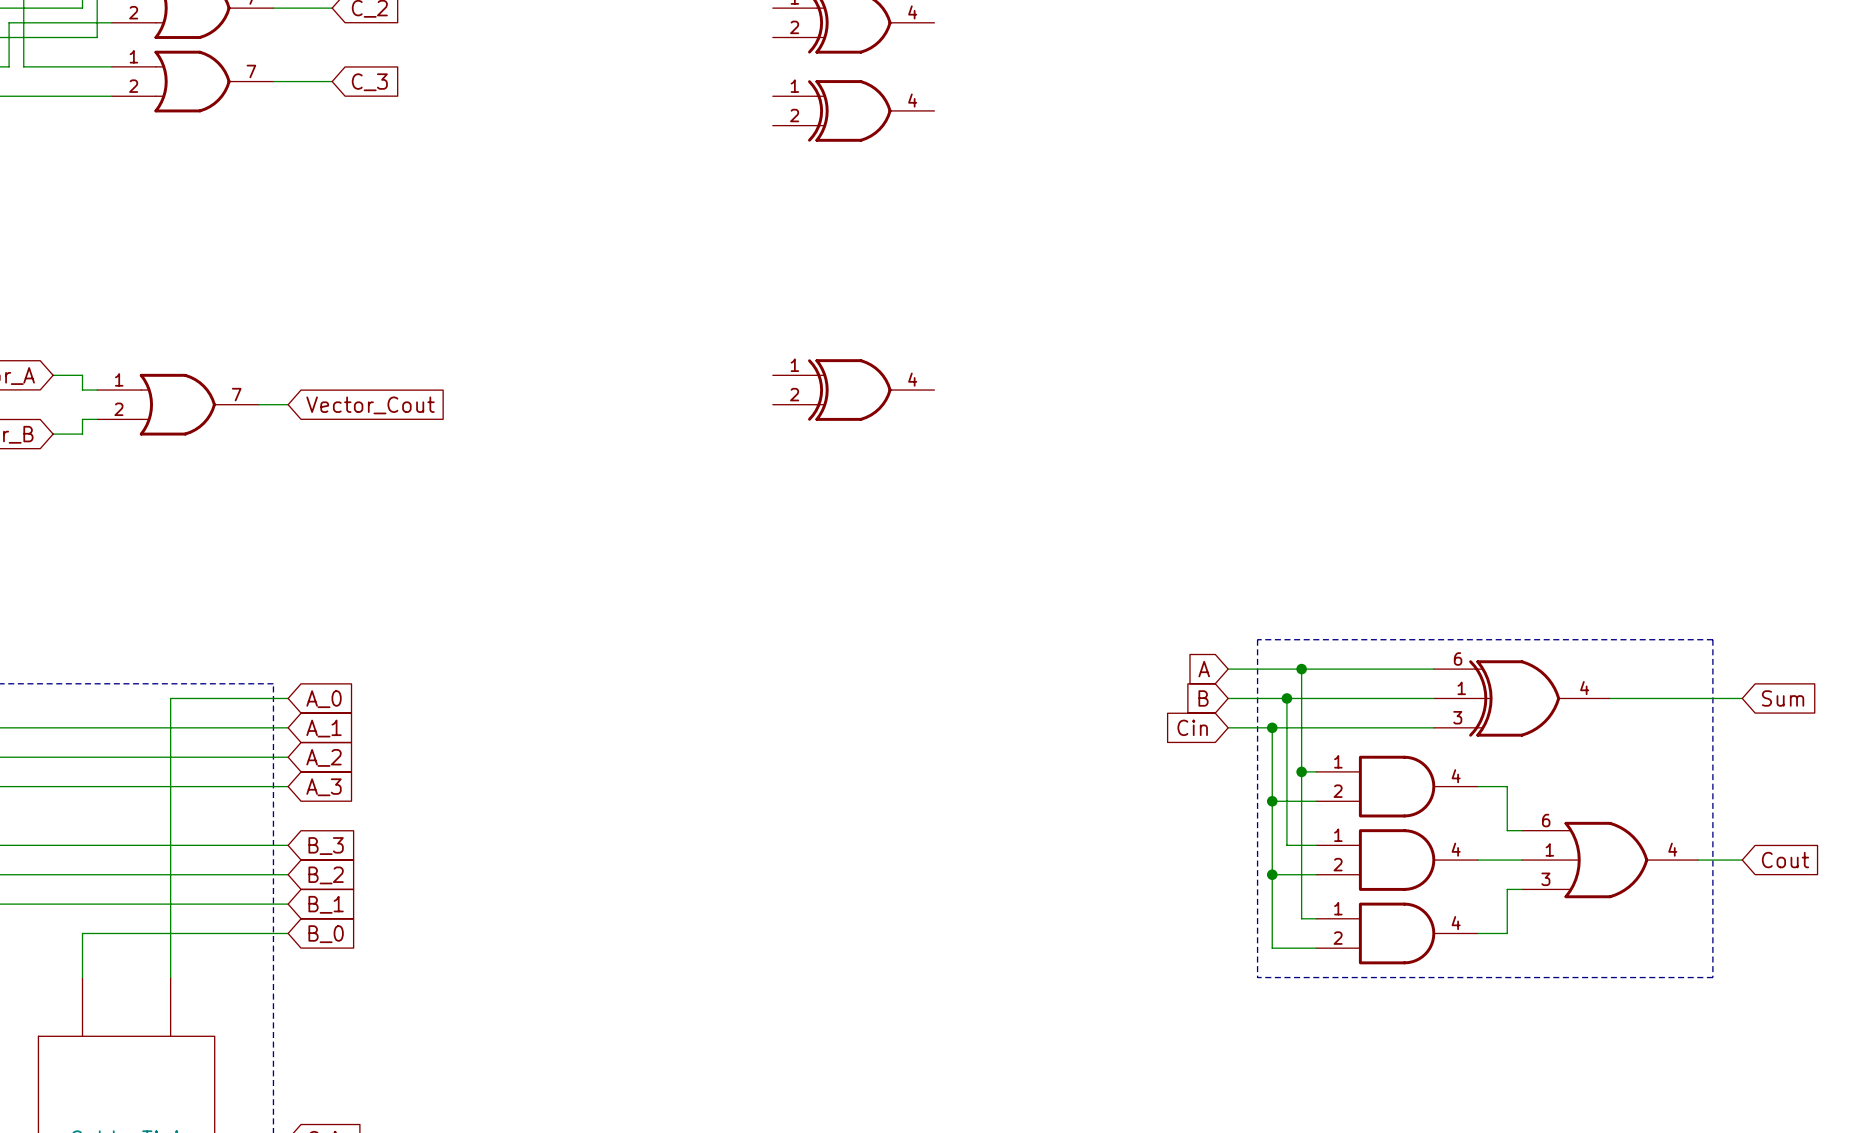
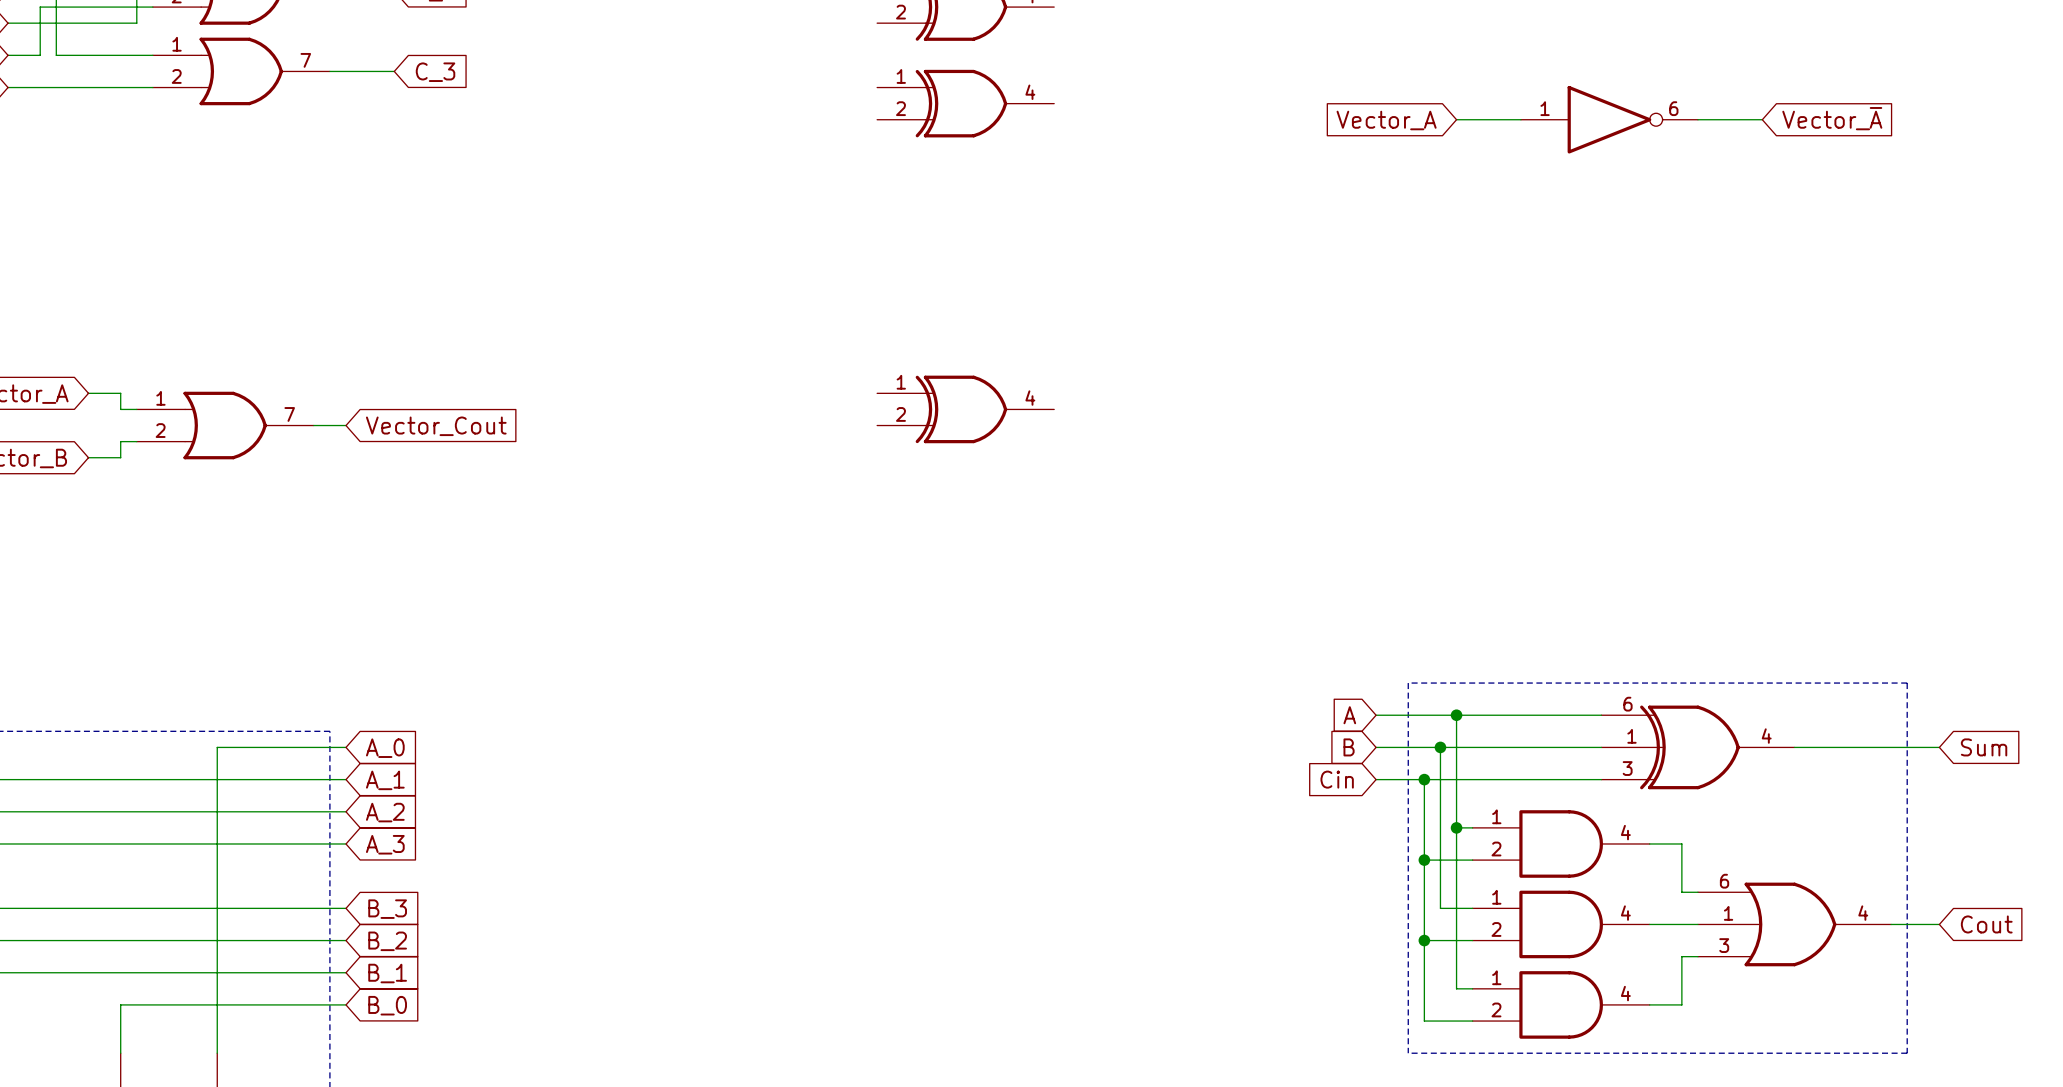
global label: none -> Vector_~{A} (1832, 118)
wire: none -> (1456, 119) (1520, 119)
part: none -> (1609, 119)
wire: none -> (1697, 119) (1762, 119)
global label: none -> Vector_A (1386, 120)

